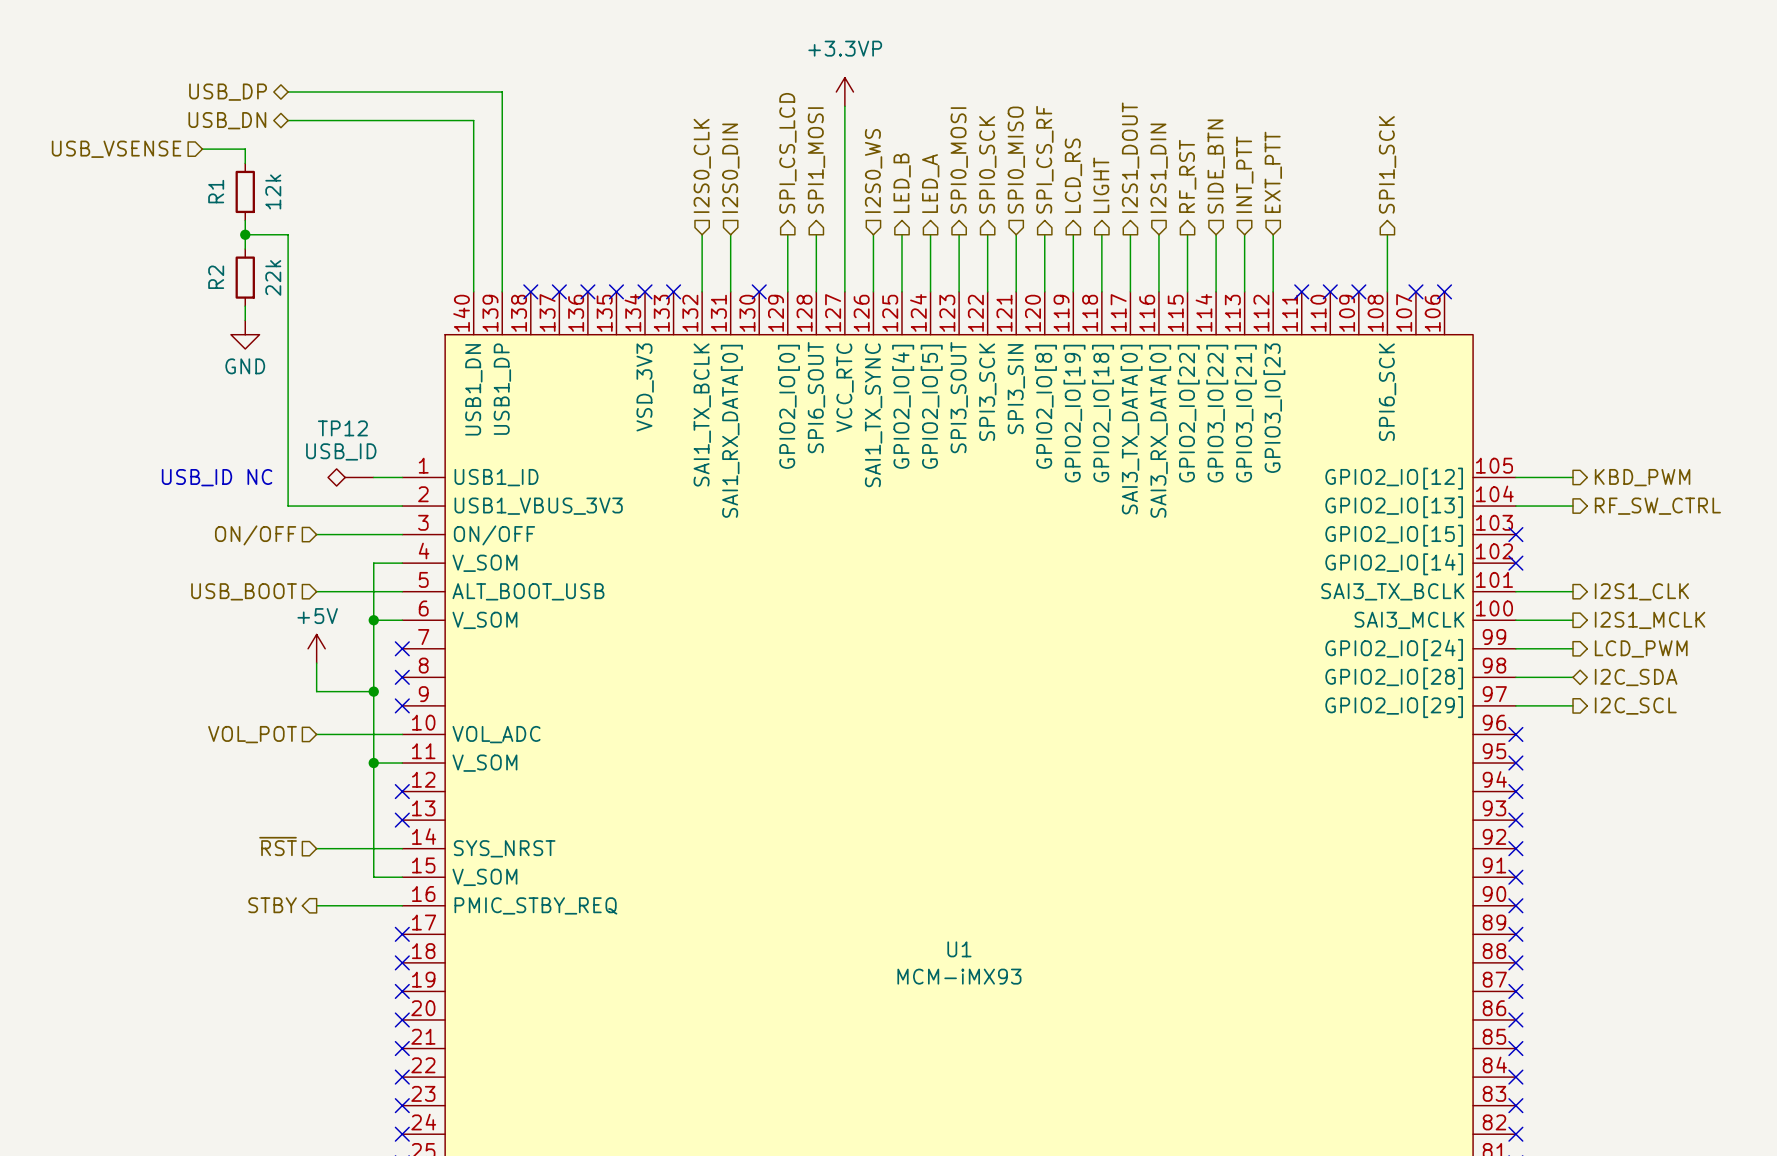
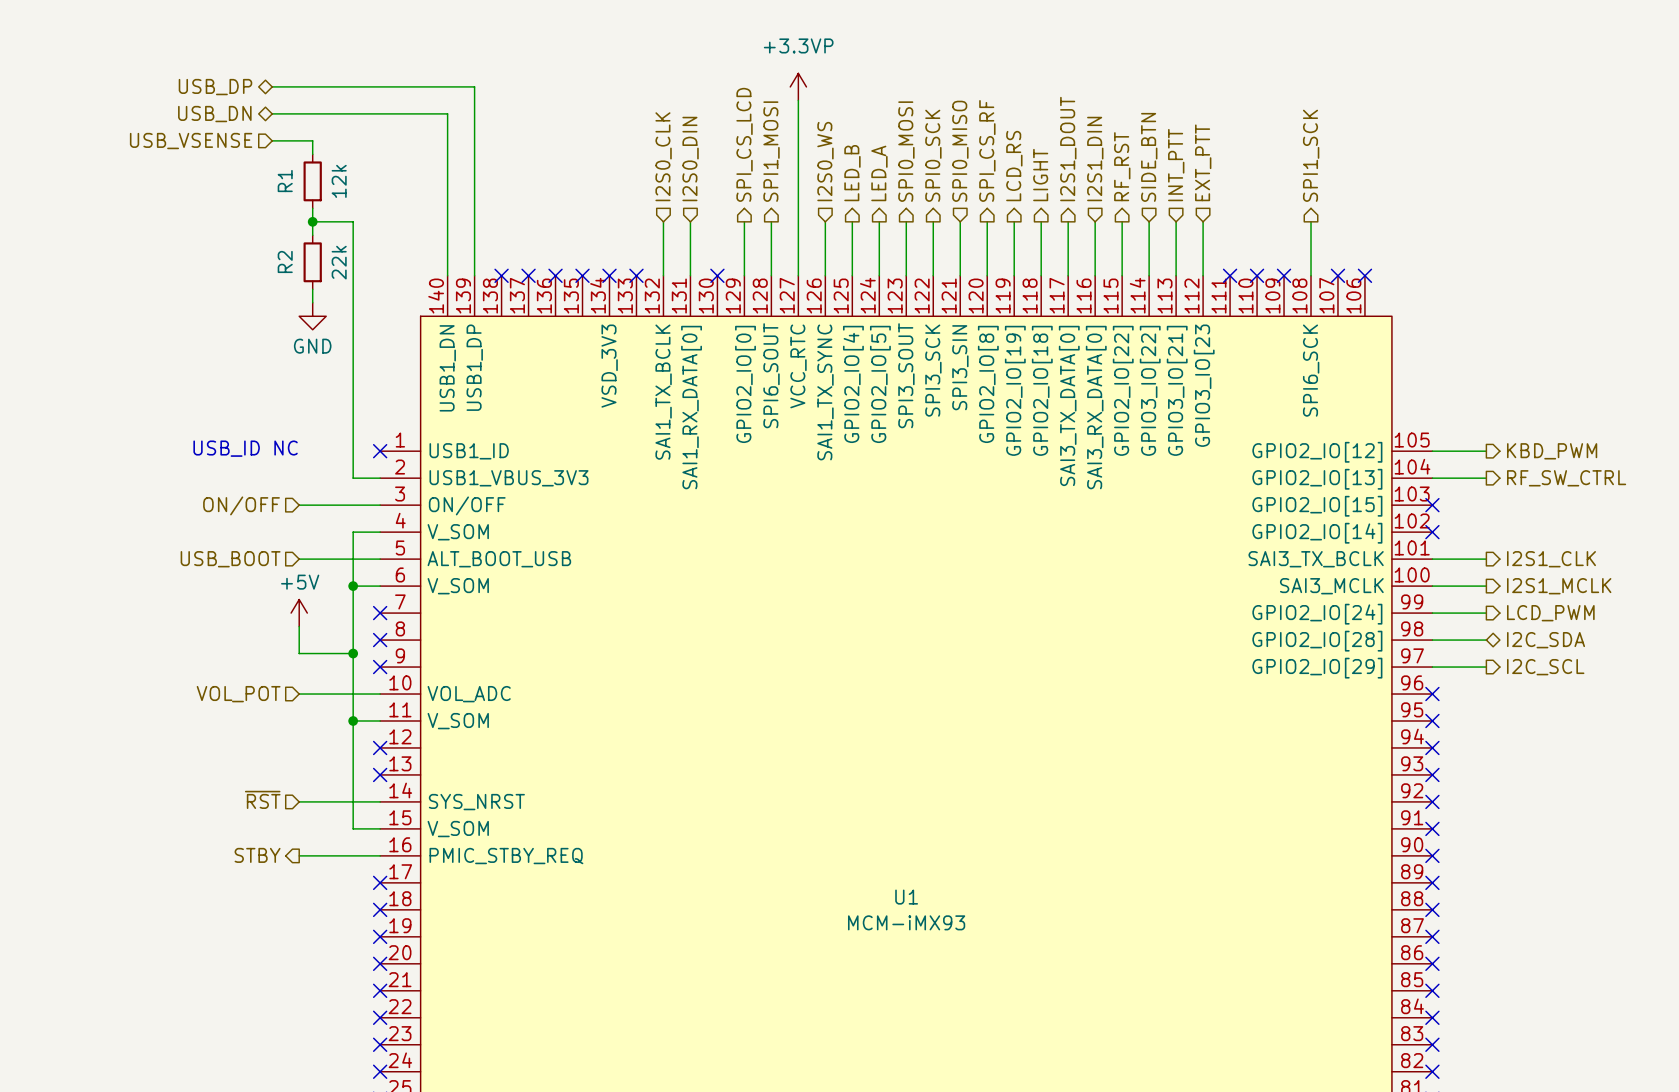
hierarchical label position: USB_VSENSE (116, 149) -> USB_VSENSE (191, 141)
wire: (202, 149) (245, 149) (245, 163) -> (272, 140) (312, 140) (312, 154)
R1 position: (245, 191) -> (312, 181)
wire: (245, 220) (245, 249) -> (312, 208) (312, 235)
wire: (245, 234) (288, 234) (288, 506) (373, 506) -> (312, 221) (353, 221) (353, 478)
junction: (245, 234) -> none
junction: none -> (312, 221)
R2 position: (245, 277) -> (312, 262)
wire: (245, 306) (245, 320) -> (312, 289) (312, 302)
power symbol position: GND (245, 334) -> GND (312, 316)
text position: USB_ID NC (217, 477) -> USB_ID NC (245, 448)
TP12: USB_ID (350, 477) -> none
wire: (373, 477) (402, 477) -> none
no-connect mark: none -> (380, 451)

